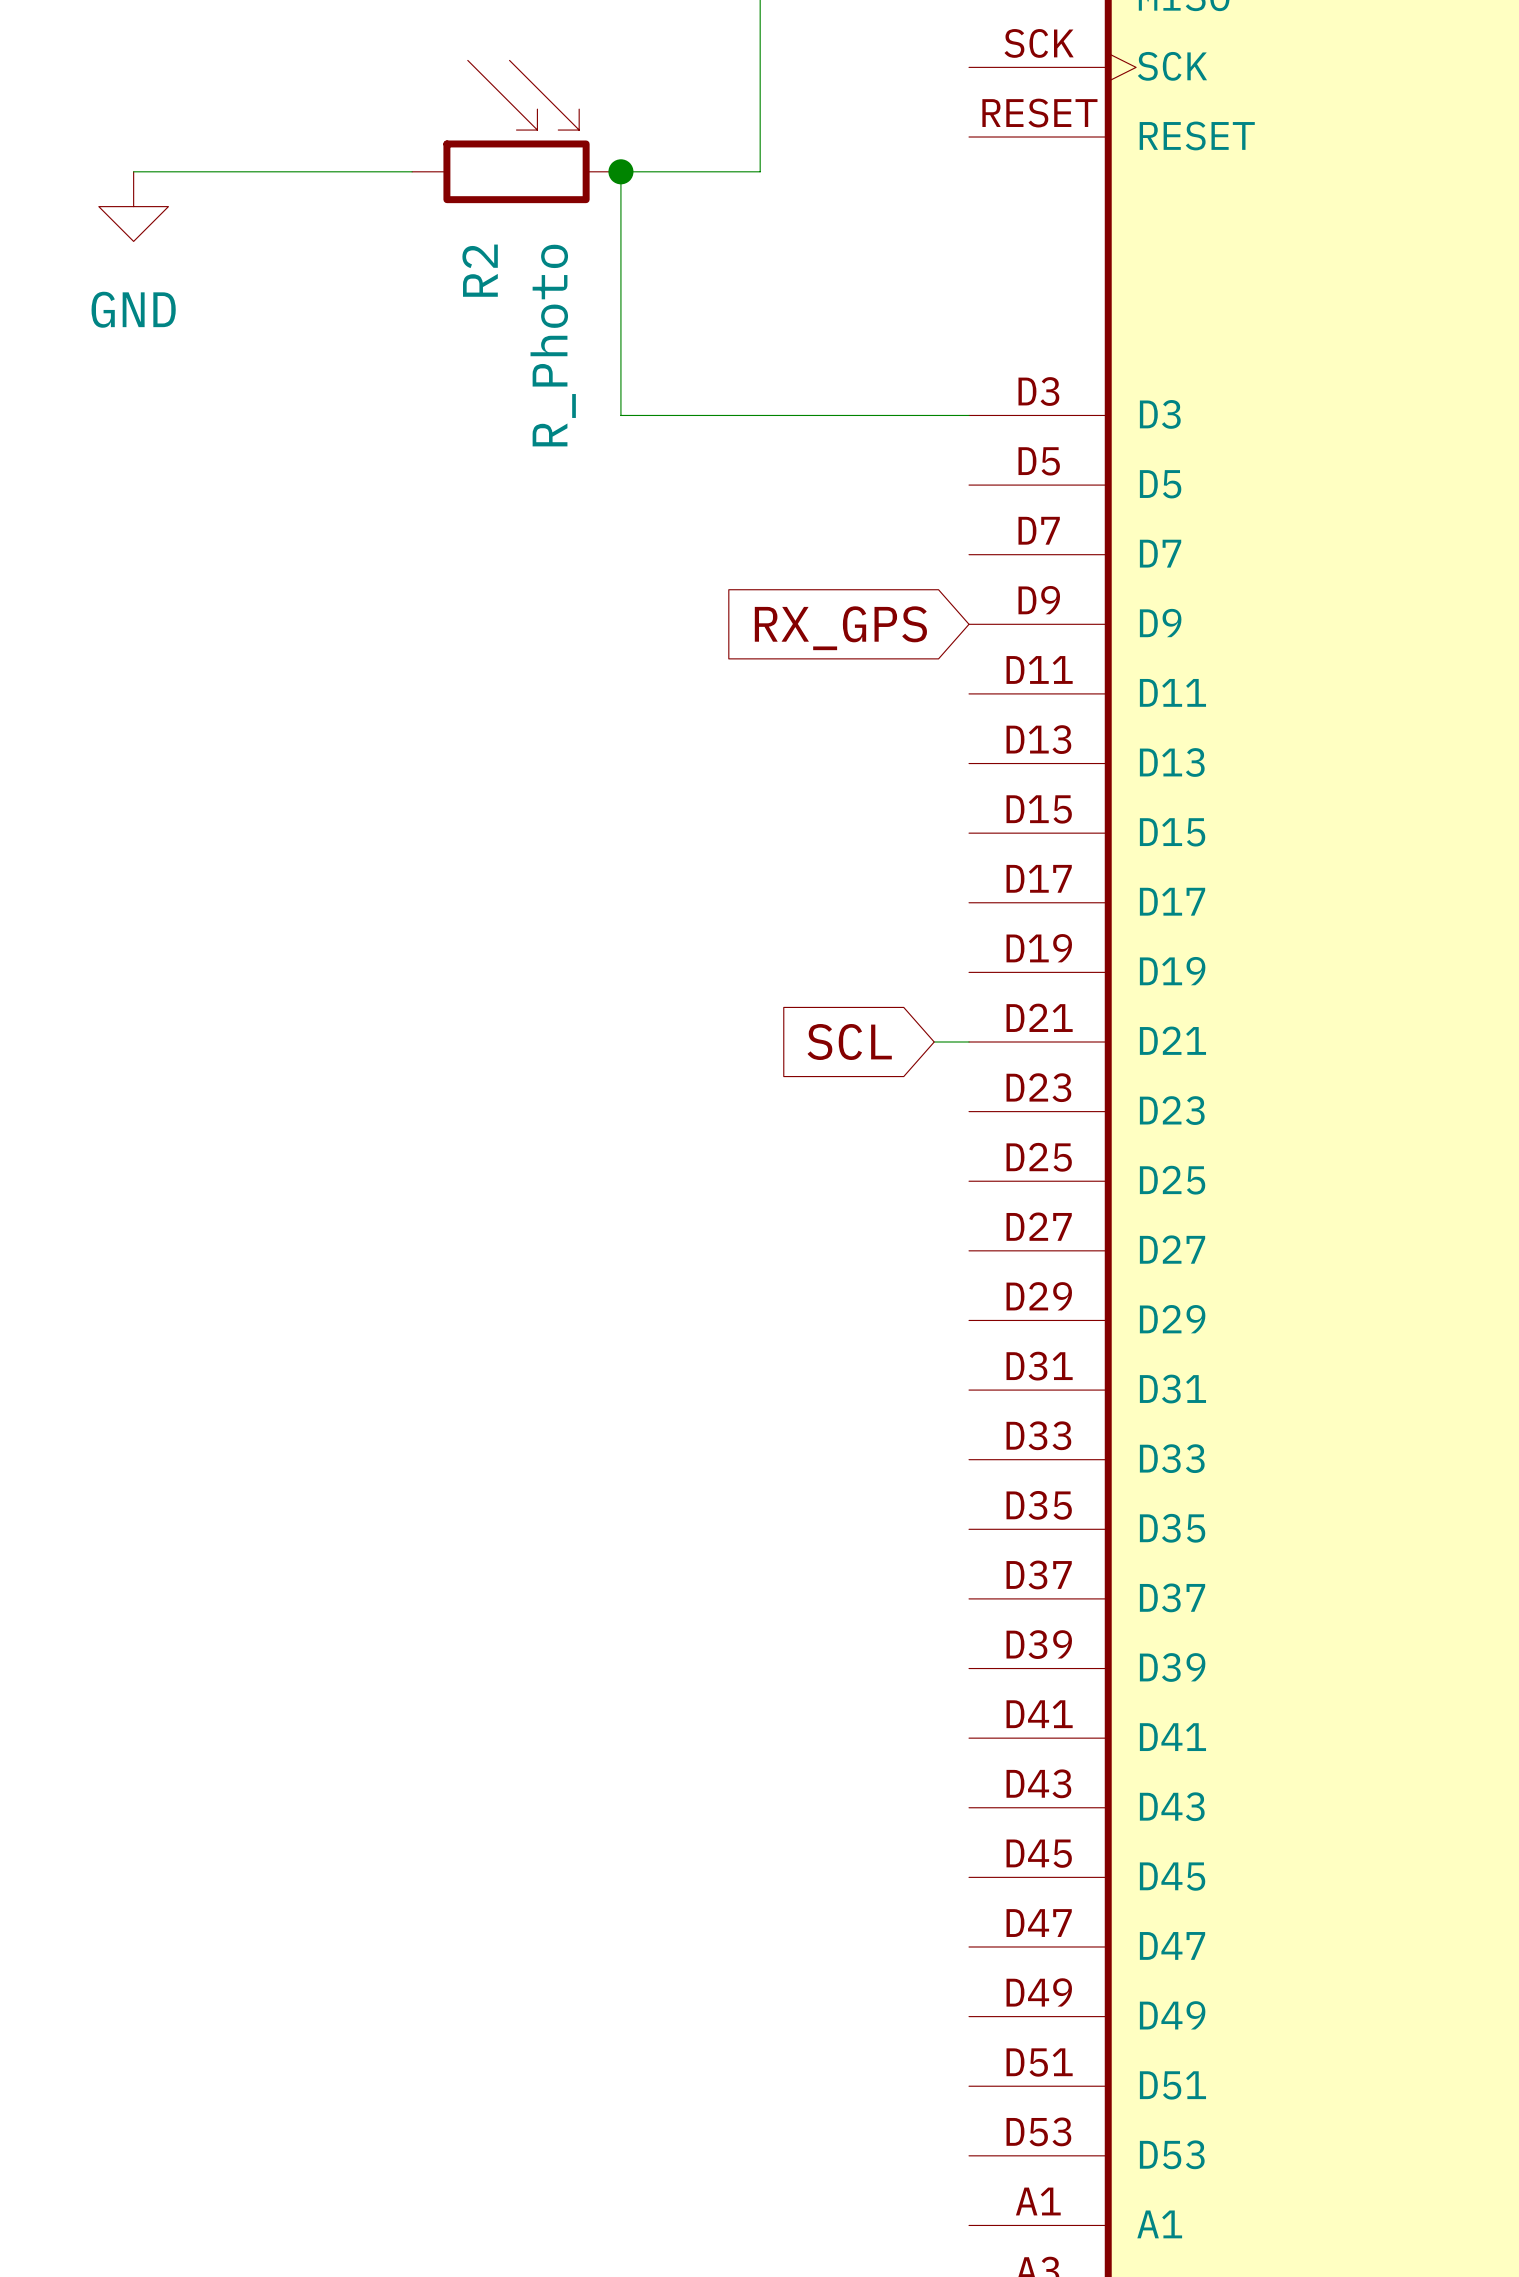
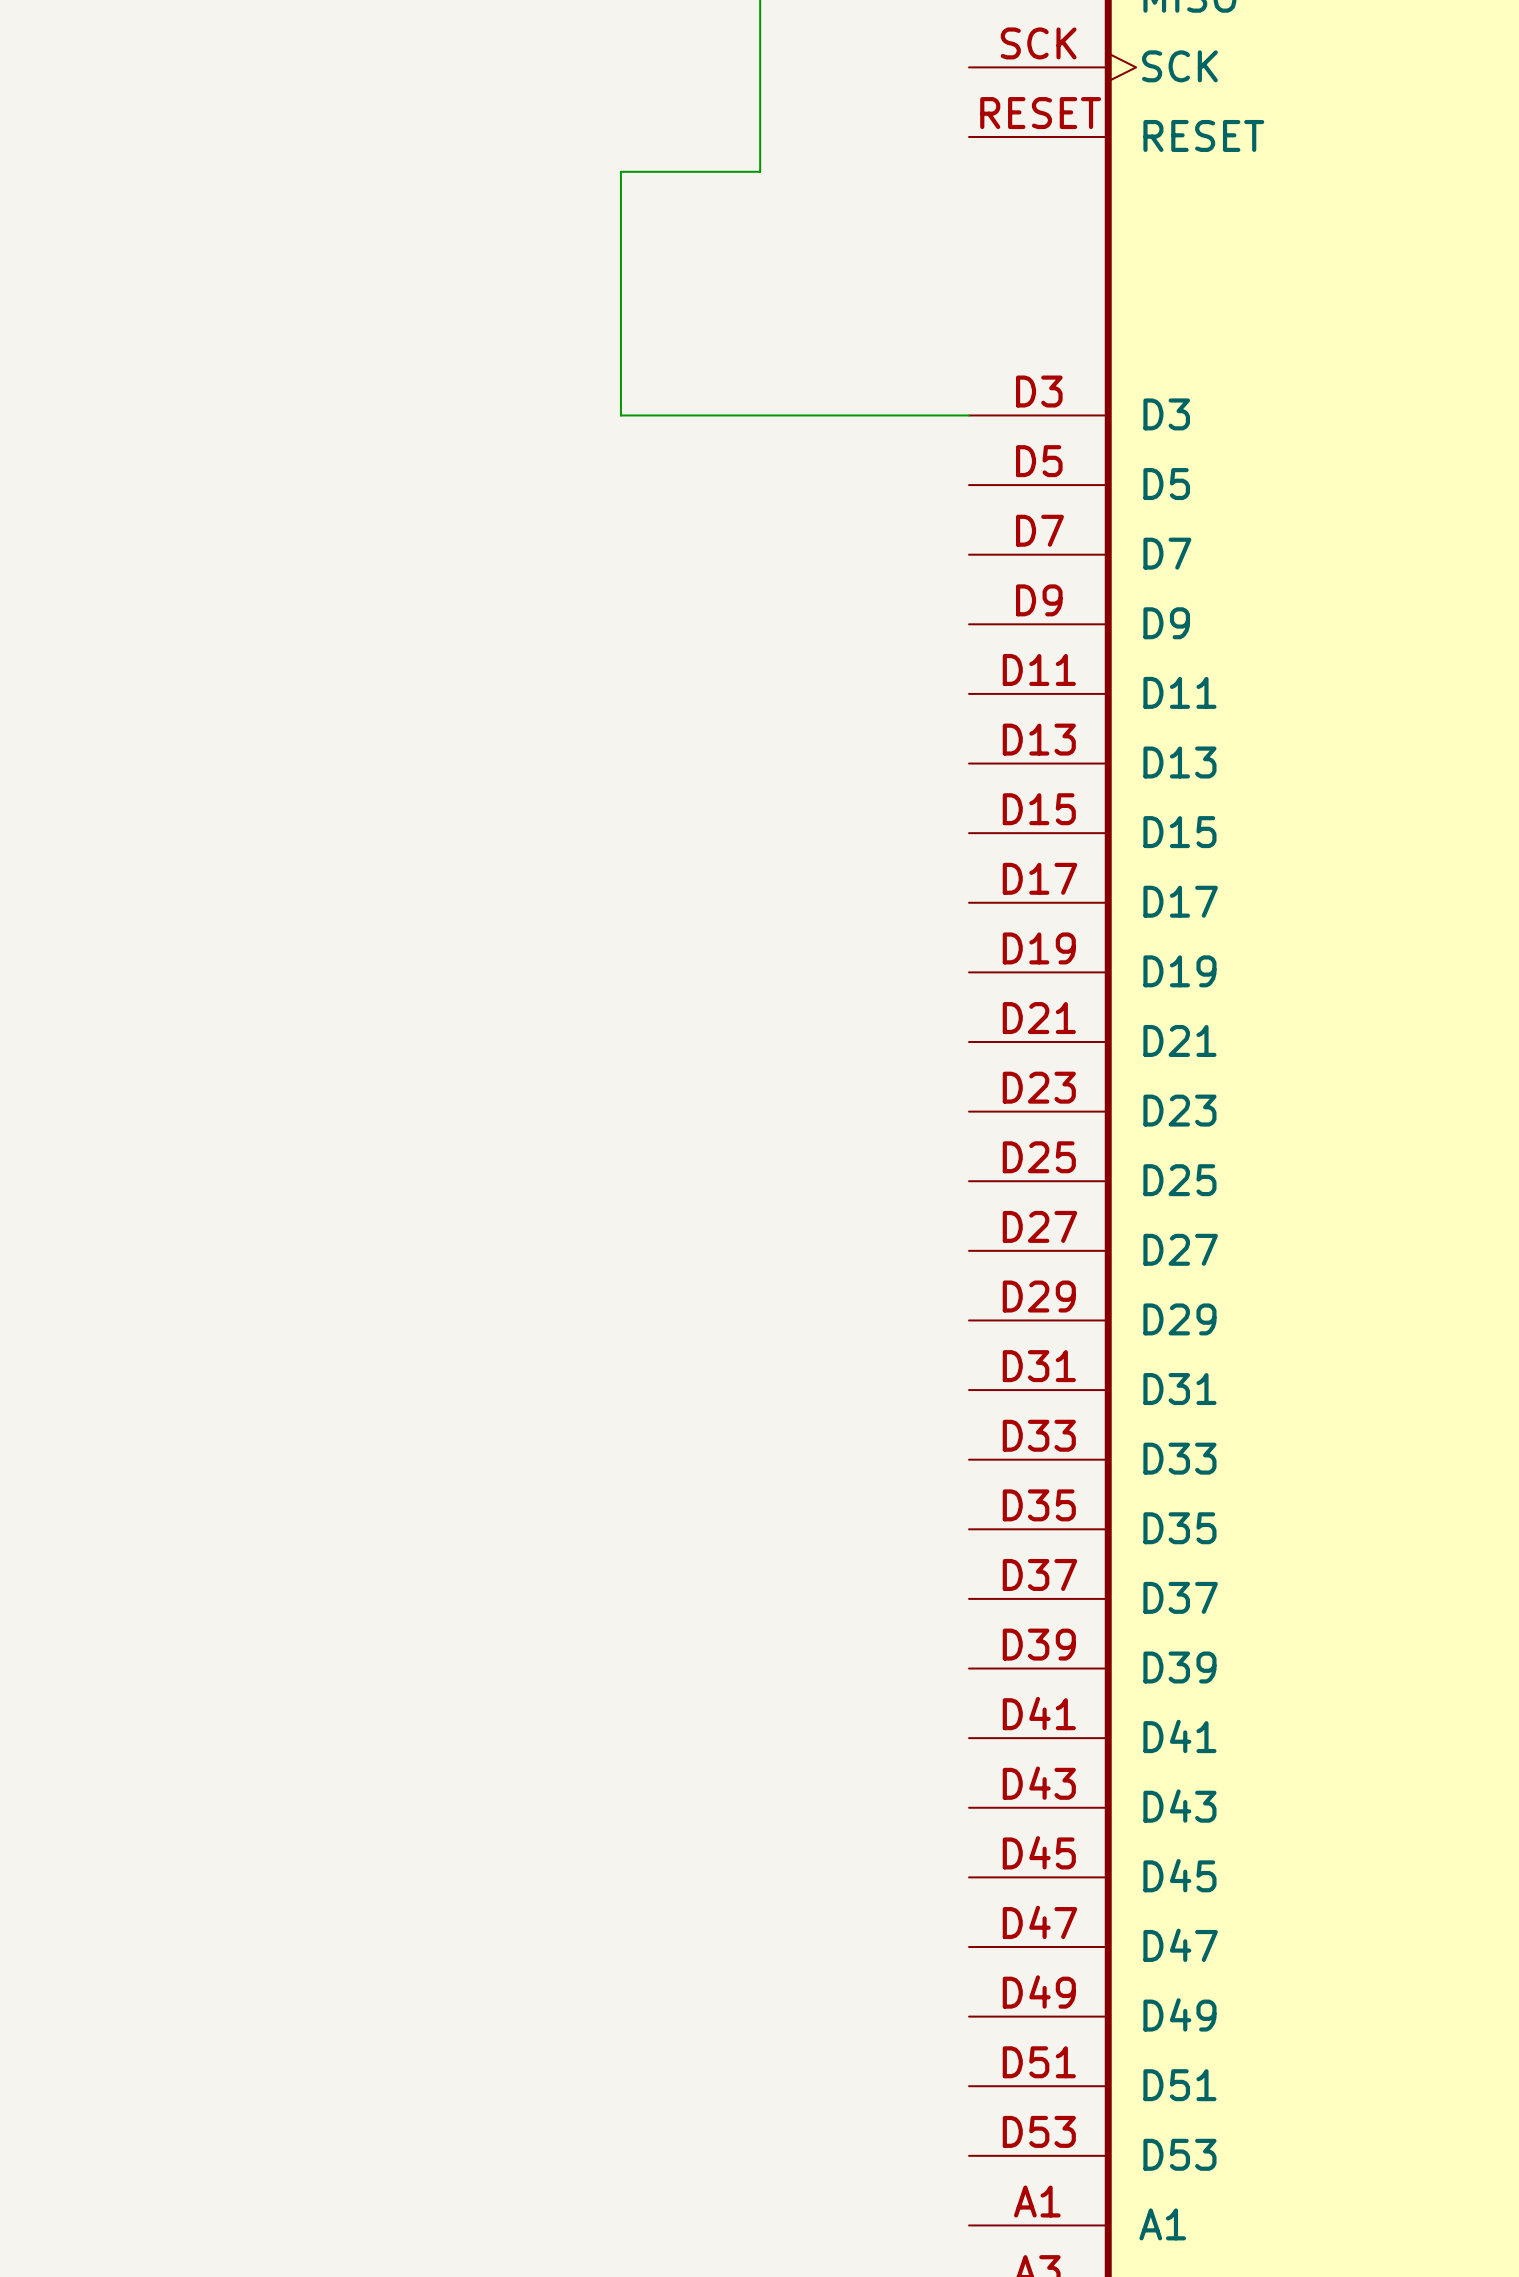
R2: R_Photo (516, 131) -> none
wire: (133, 171) (412, 171) -> none
junction: (620, 171) -> none
power symbol: GND (133, 206) -> none
global label: RX_GPS (840, 628) -> none
global label: SCL (849, 1041) -> none
wire: (934, 1041) (969, 1041) -> none

